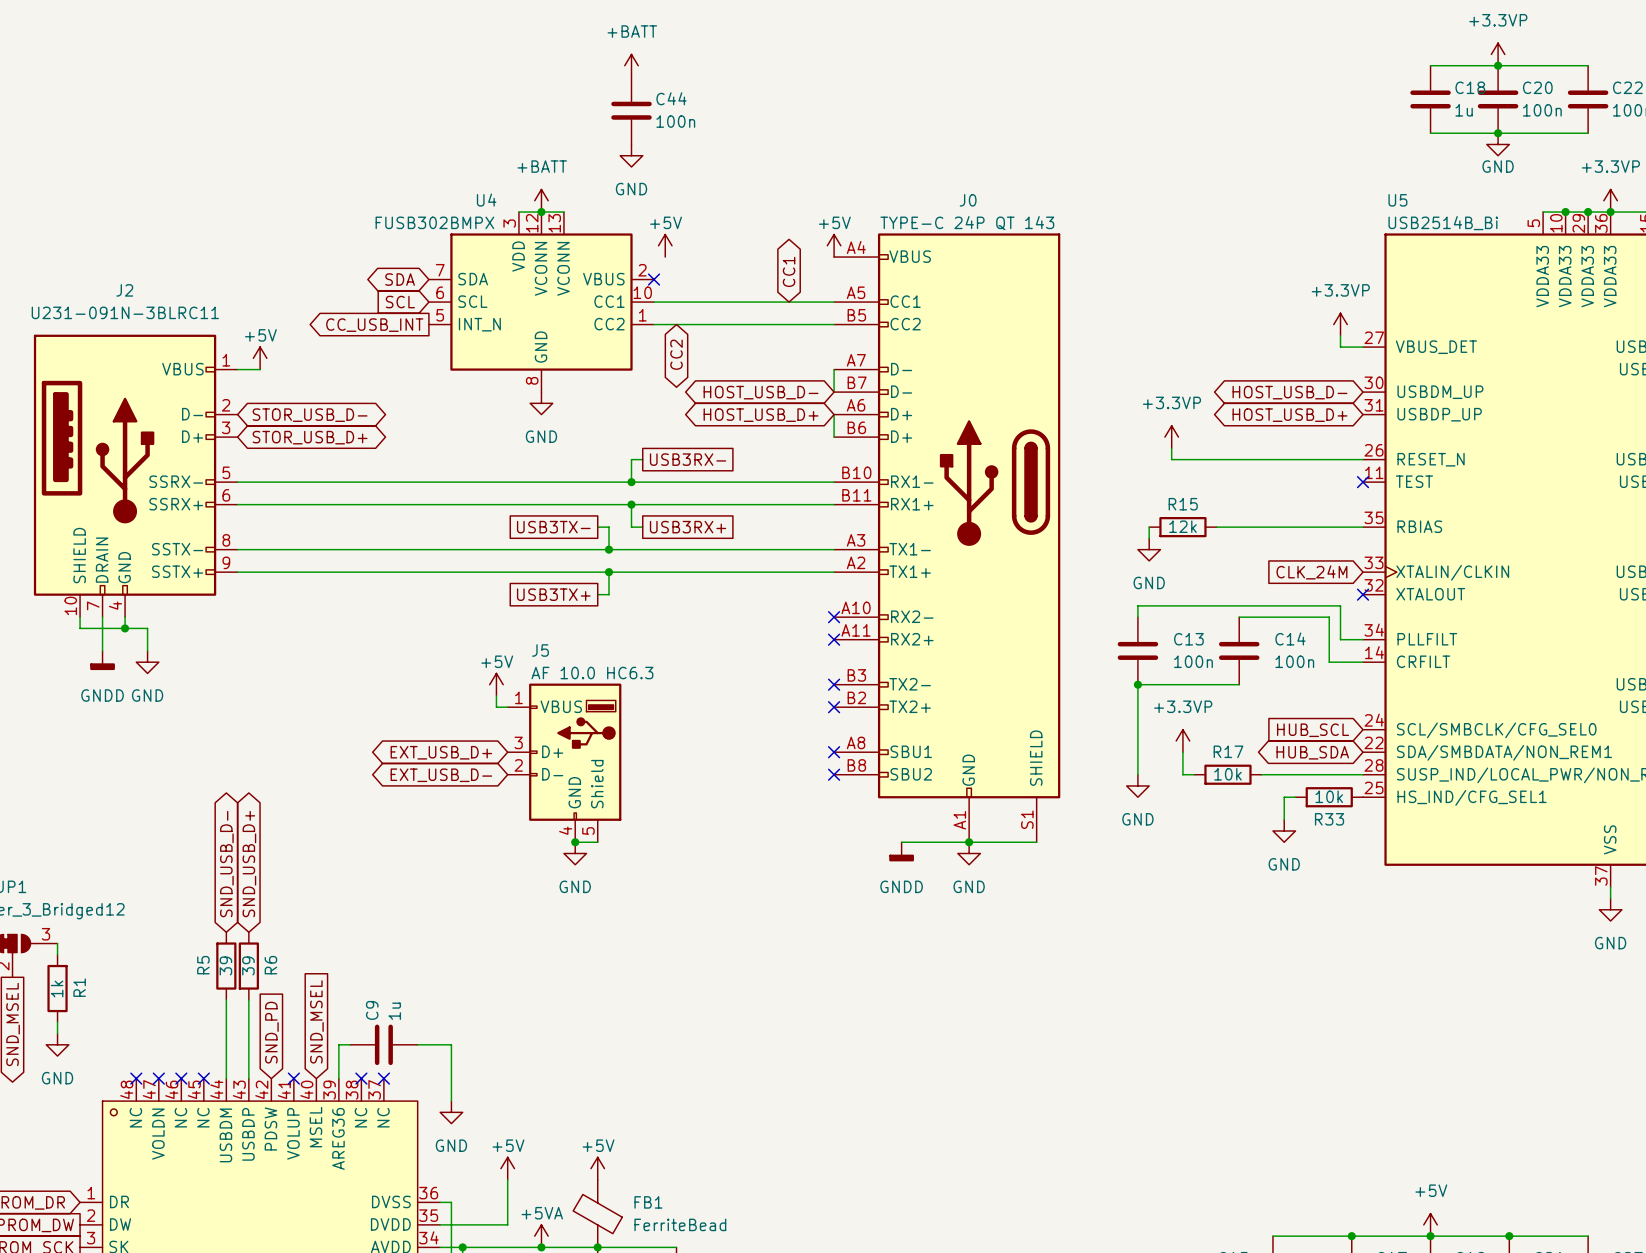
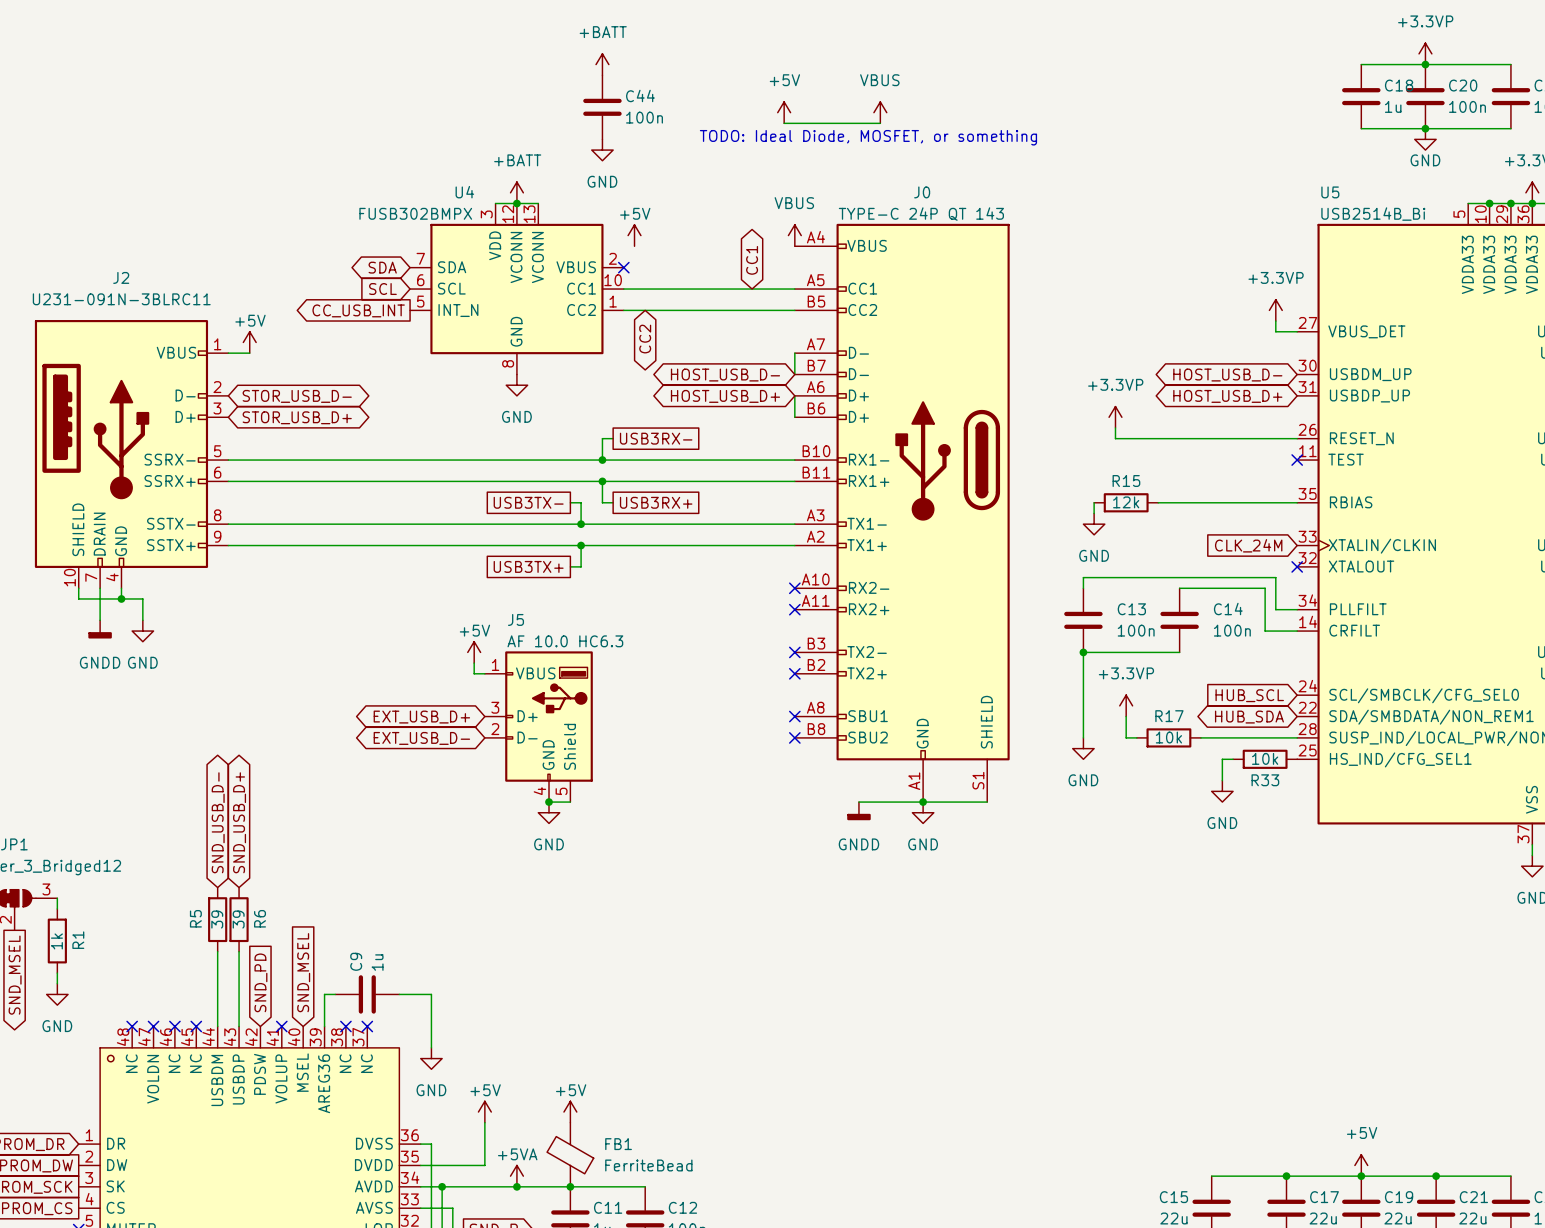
power symbol: none -> +5V (784, 112)
power symbol: none -> VBUS (880, 112)
wire: none -> (784, 123) (880, 123)
text: none -> TODO: Ideal Diode, MOSFET, or something (868, 137)
power symbol: +5V (834, 245) -> VBUS (794, 235)

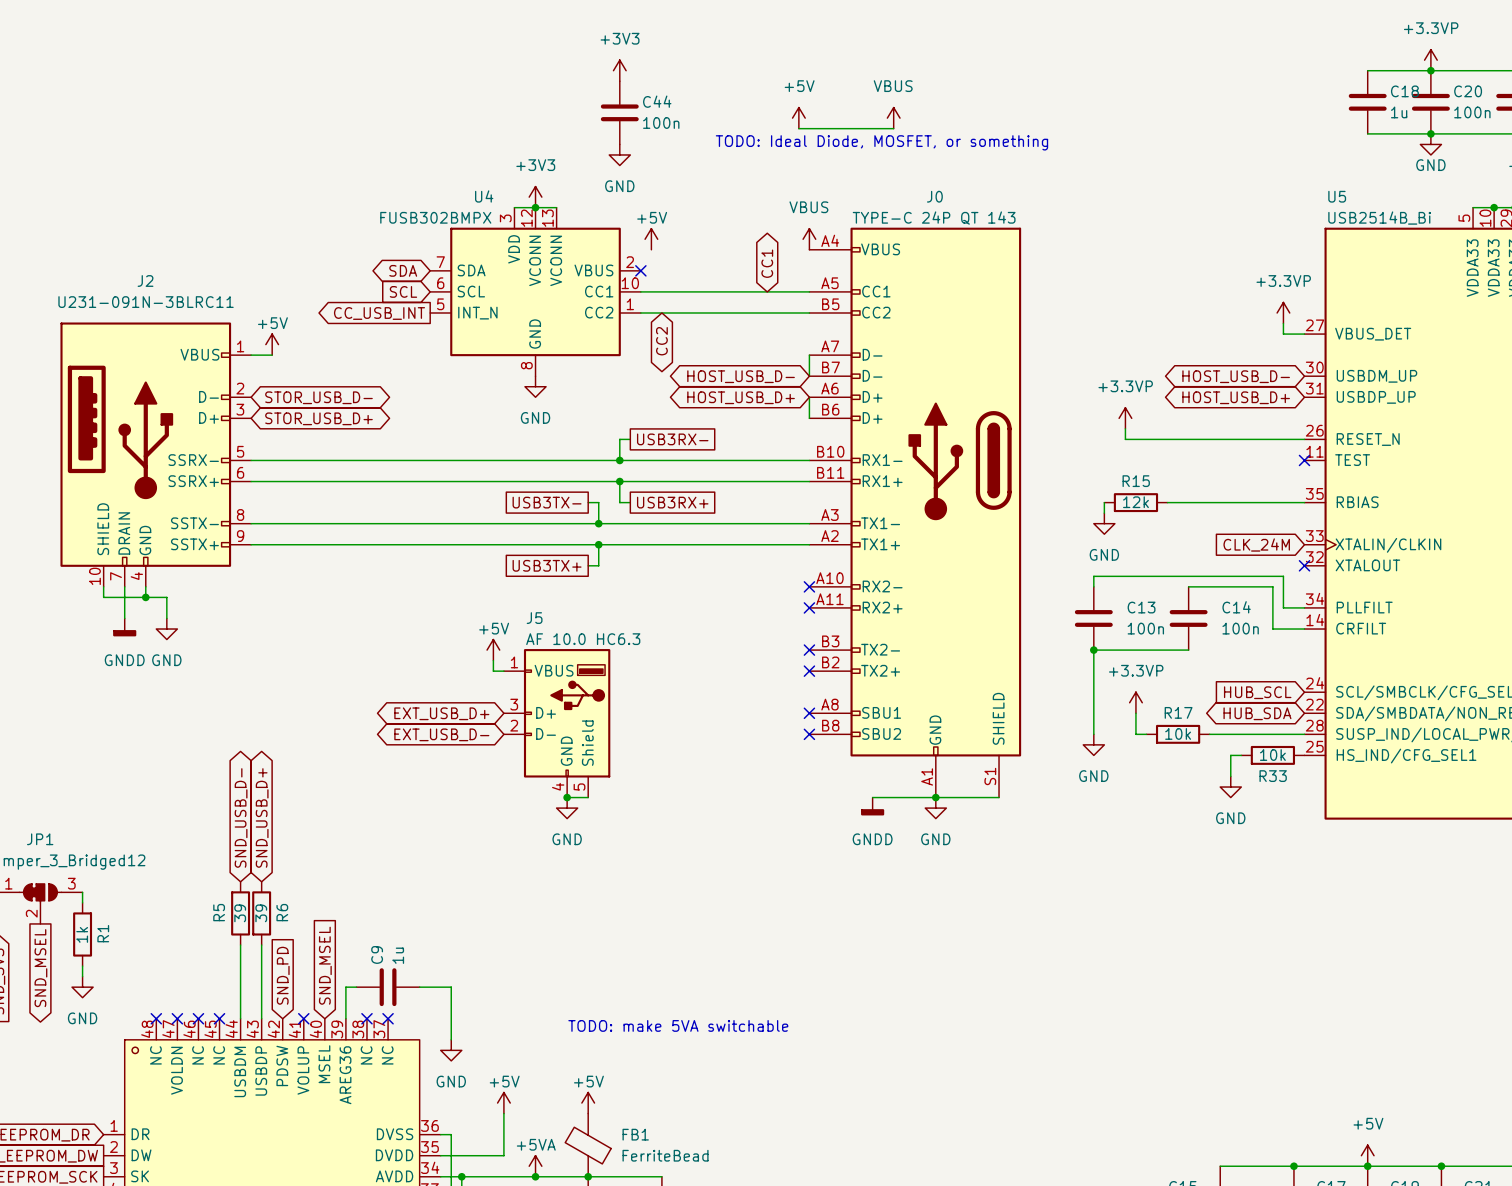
power symbol: +BATT (602, 64) -> +3V3 (619, 70)
power symbol: +BATT (516, 192) -> +3V3 (535, 197)
text: none -> TODO: make 5VA switchable (678, 1025)

